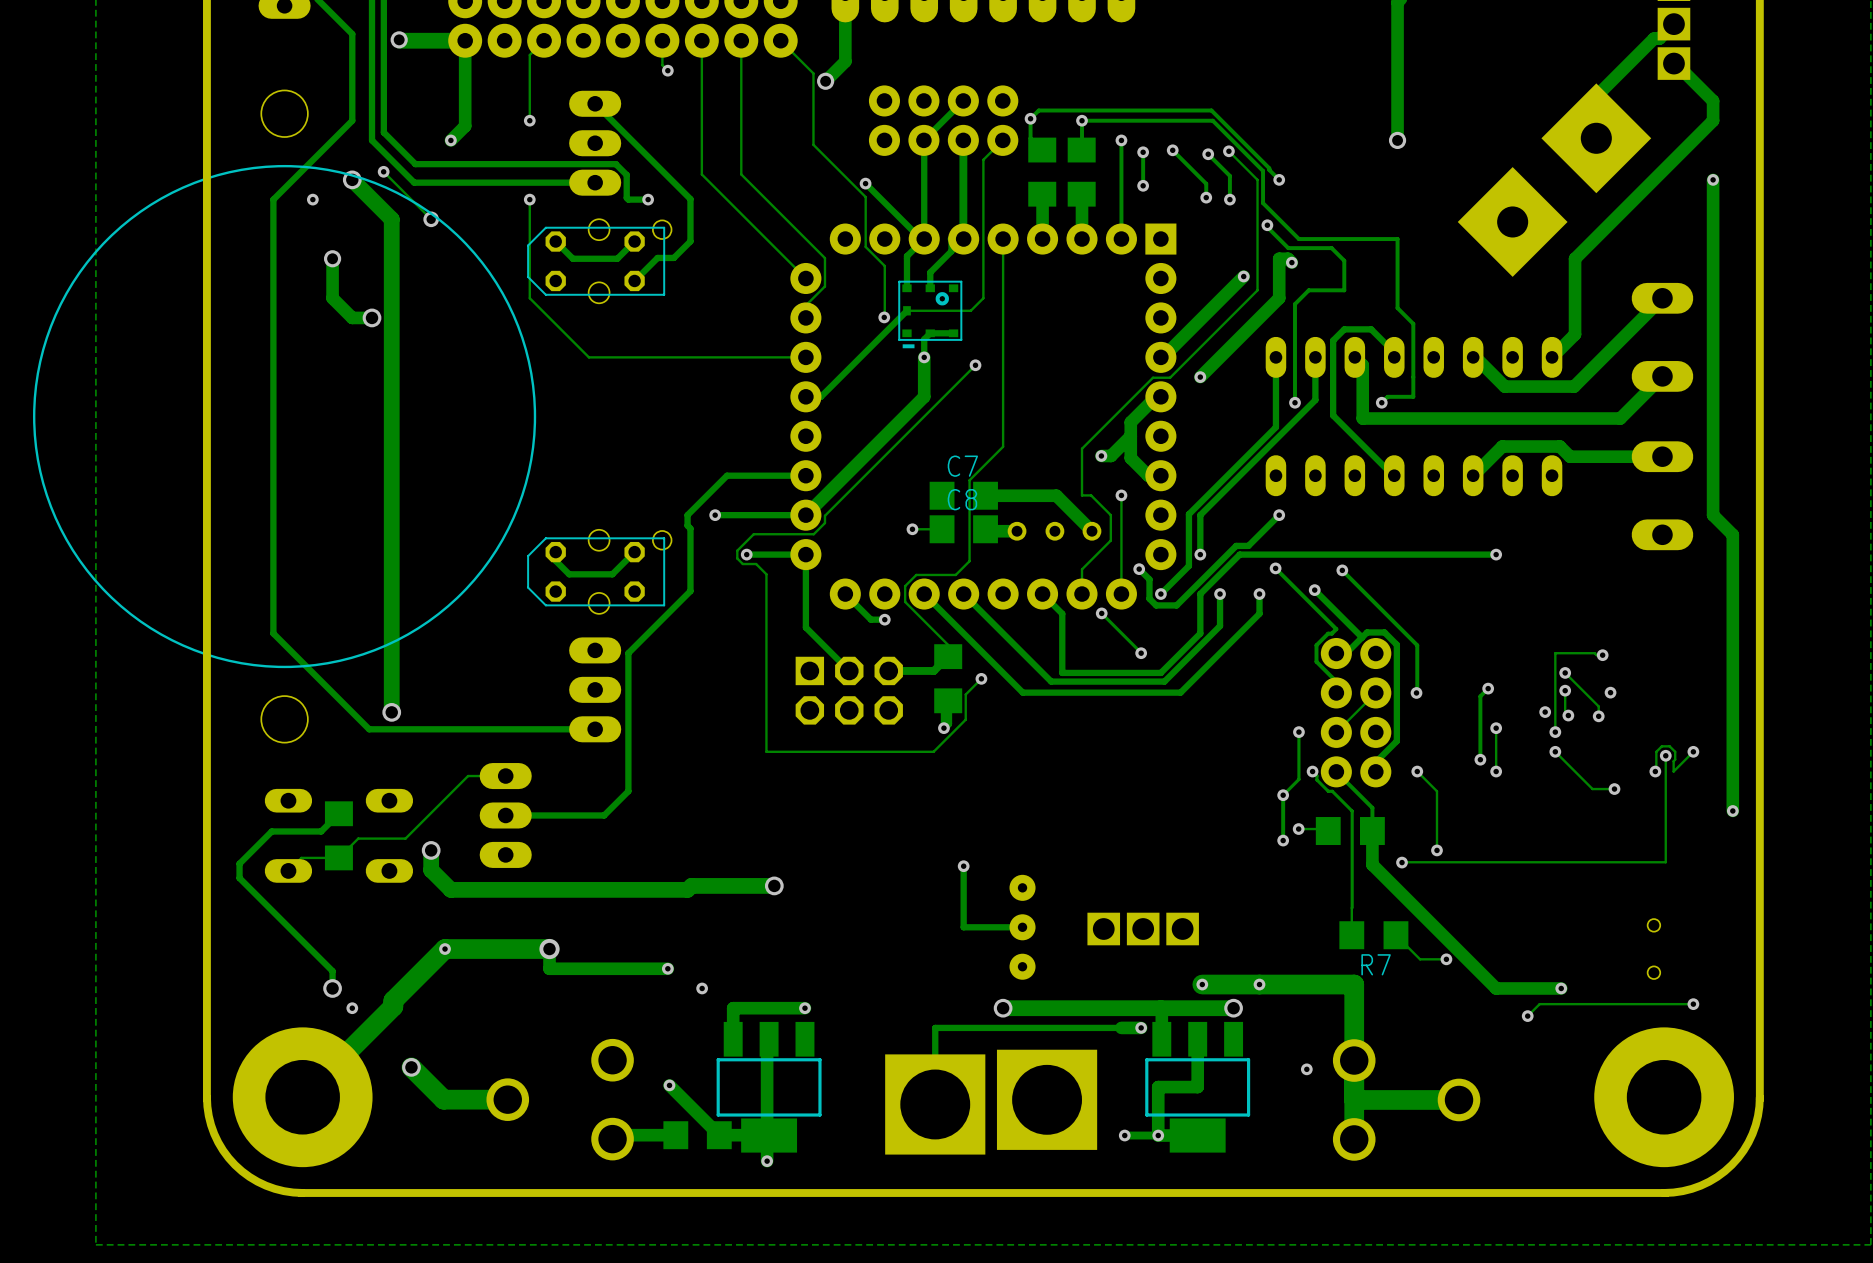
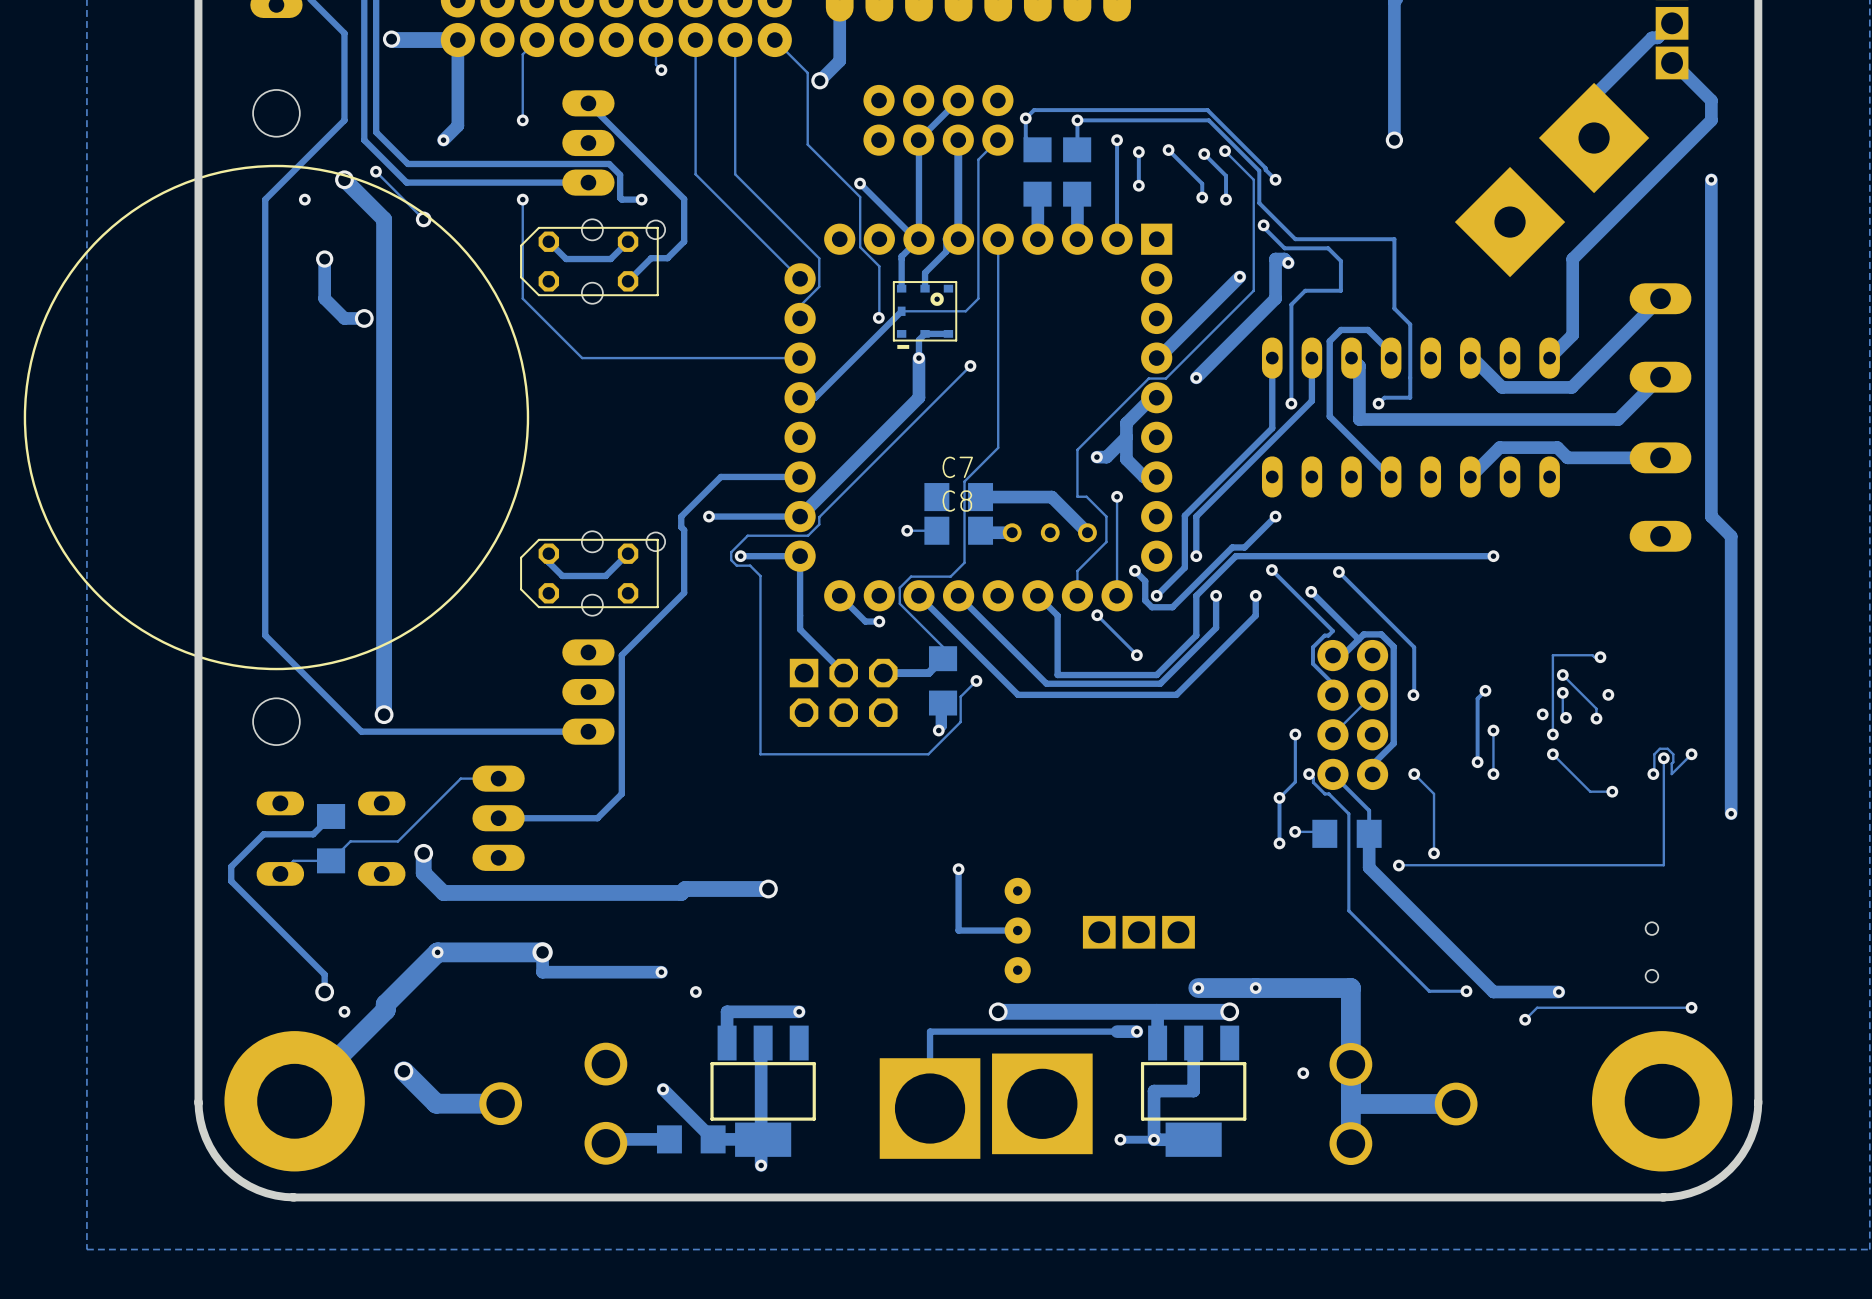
track: (1352, 907) (1351, 935) -> (1348, 910) (1429, 991) (1466, 991)
R7: (1373, 935) -> none
track: (1395, 935) (1420, 959) (1446, 959) -> none
via position: (1446, 959) -> (1466, 991)

